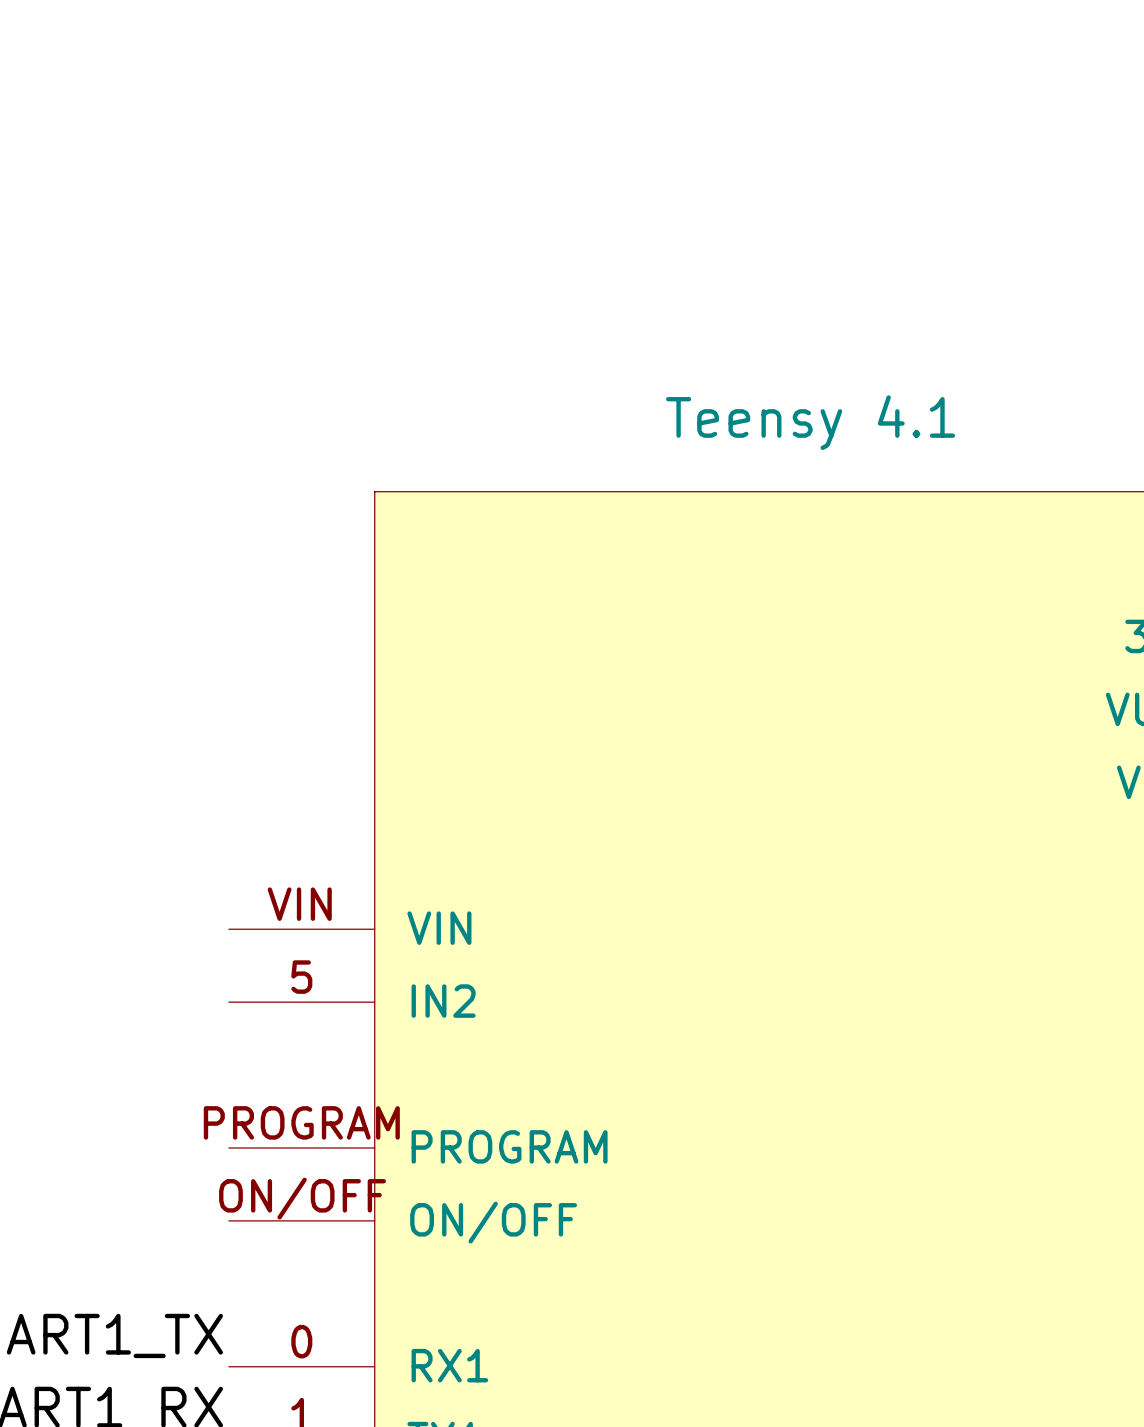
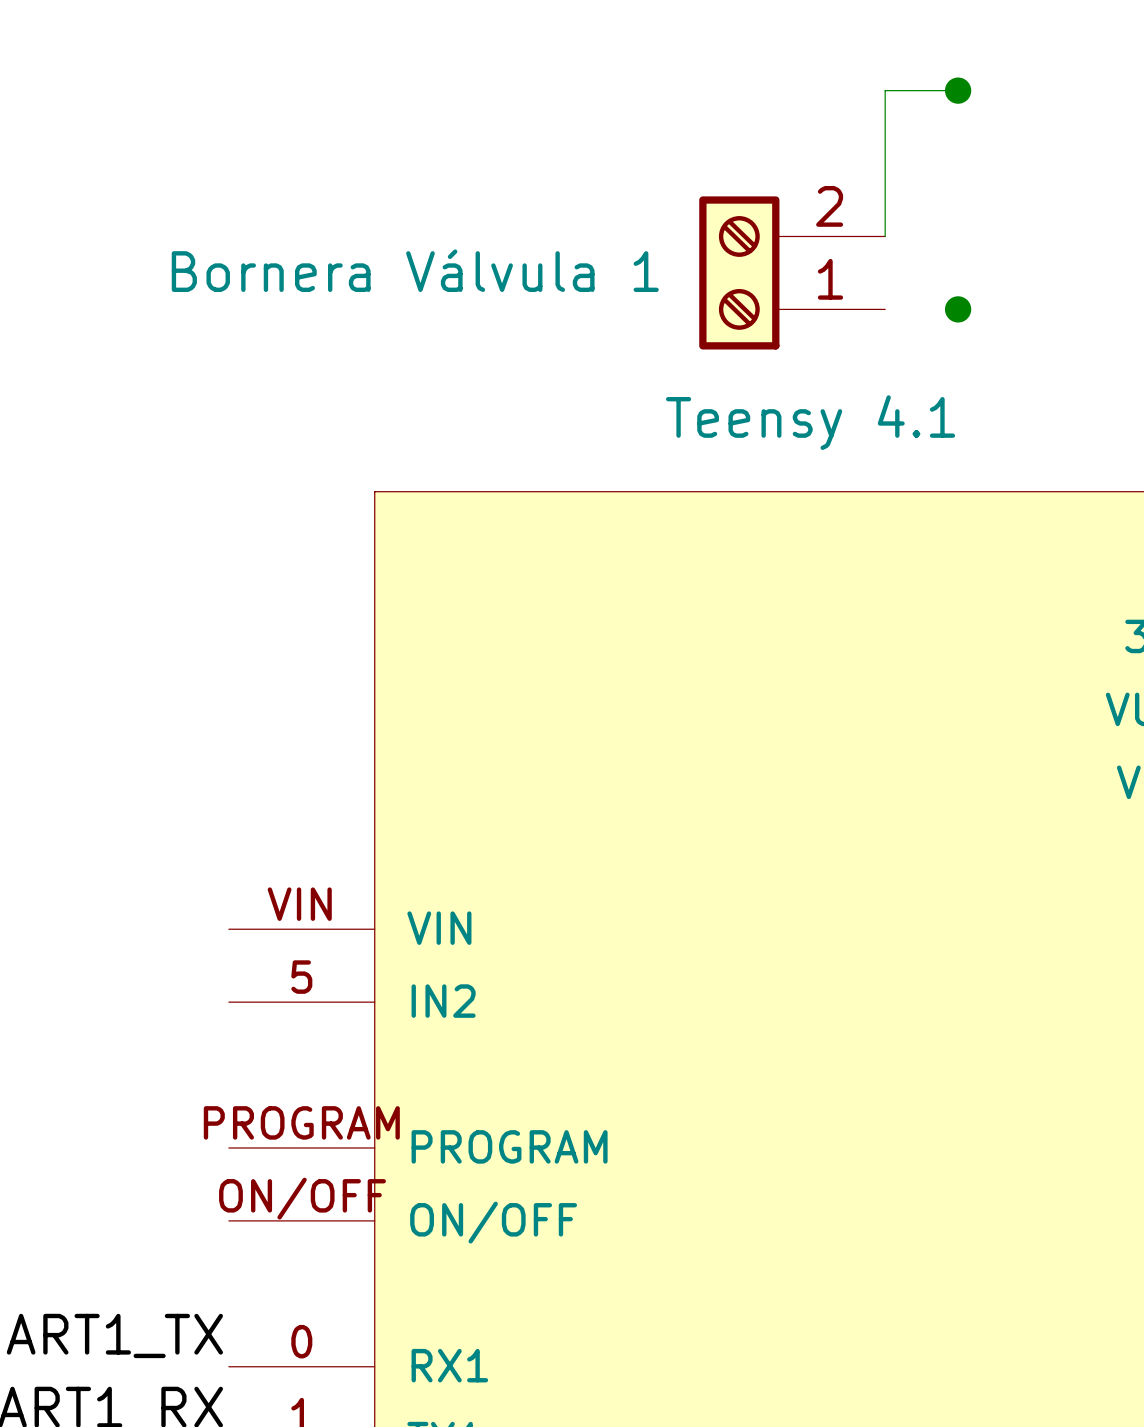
wire: none -> (958, 90) (885, 90) (885, 236)
junction: none -> (958, 90)
part: none -> Bornera Válvula 1 (792, 272)
junction: none -> (958, 309)

